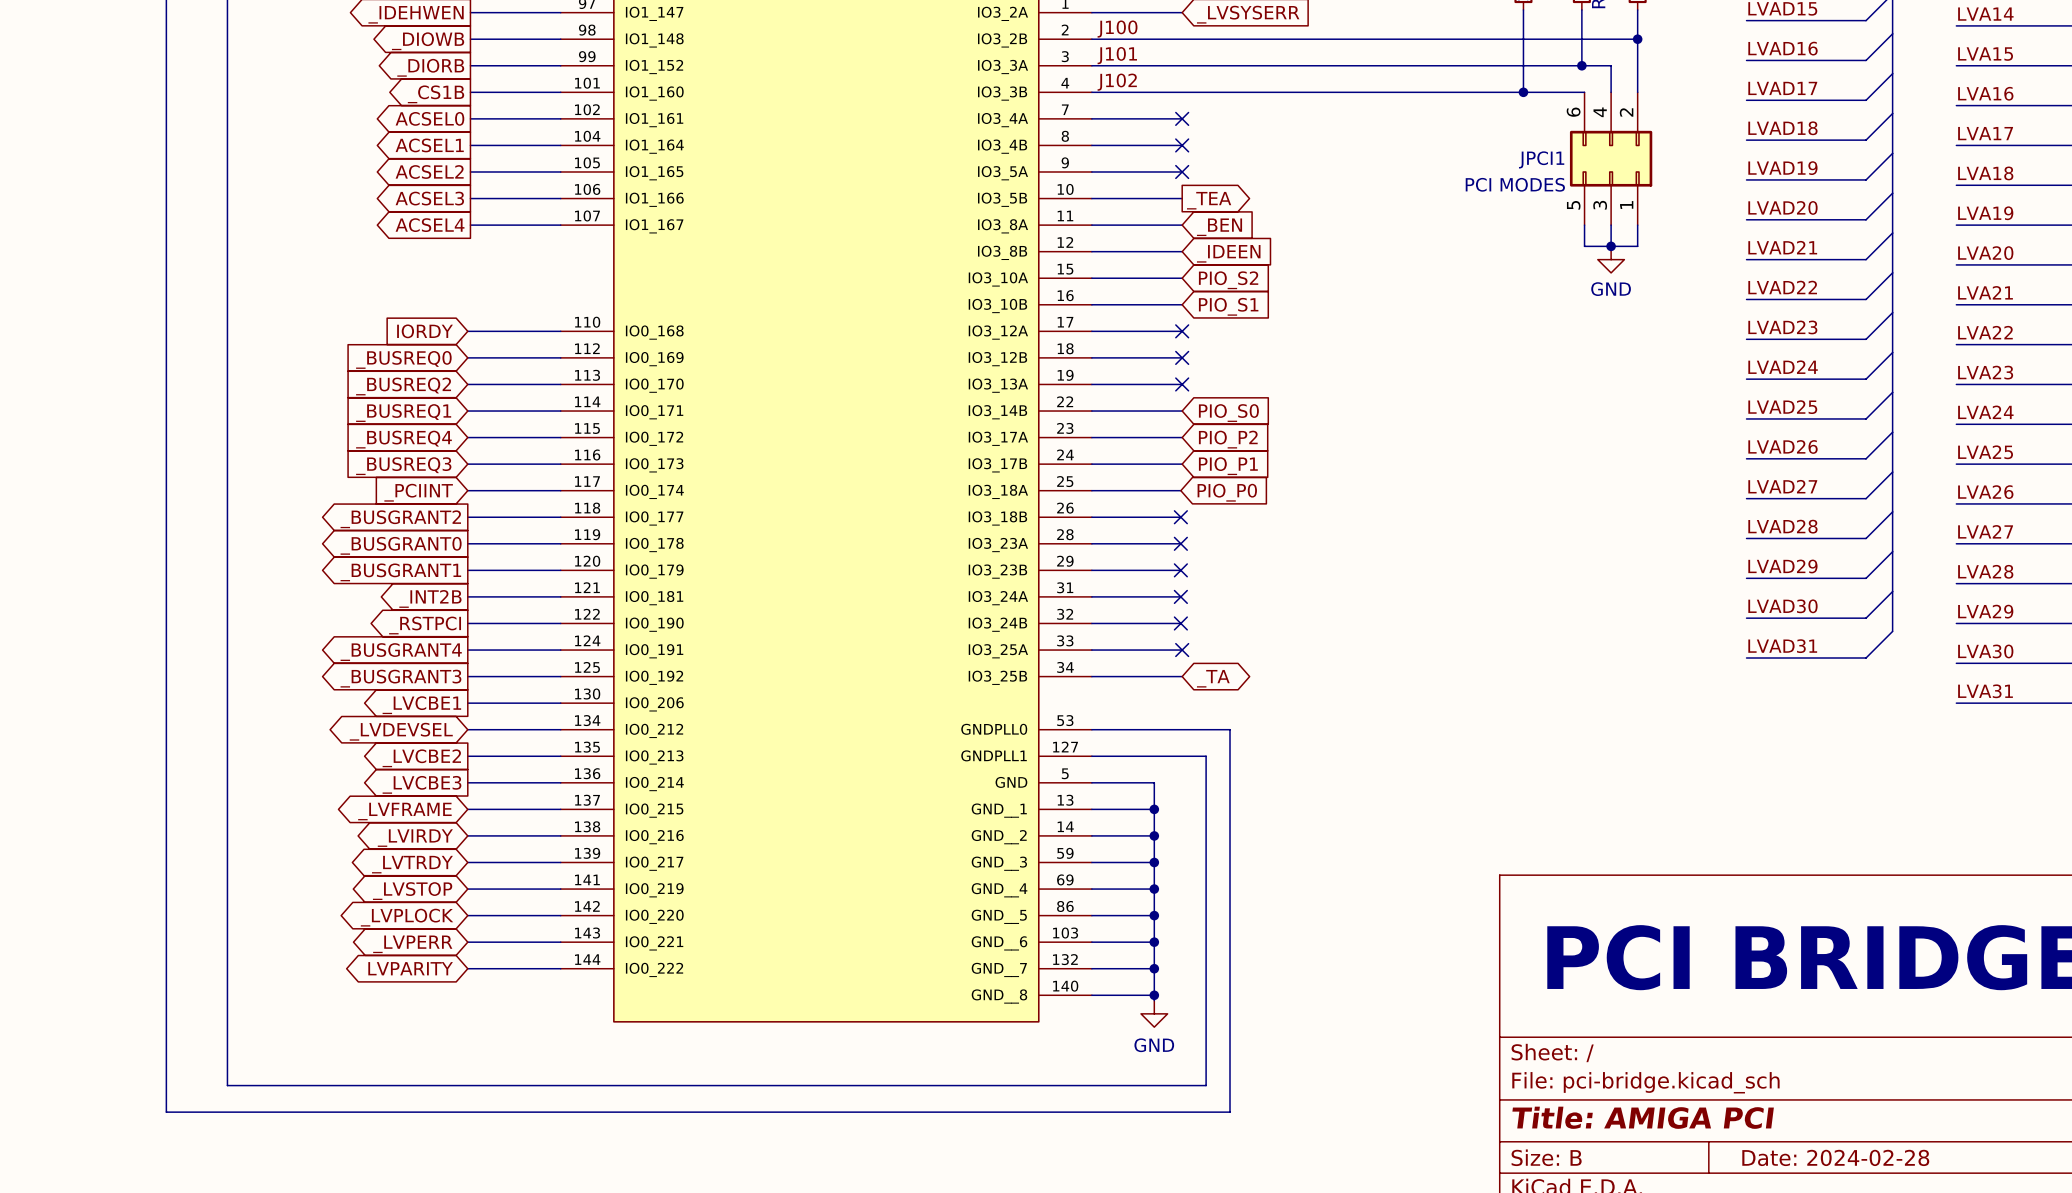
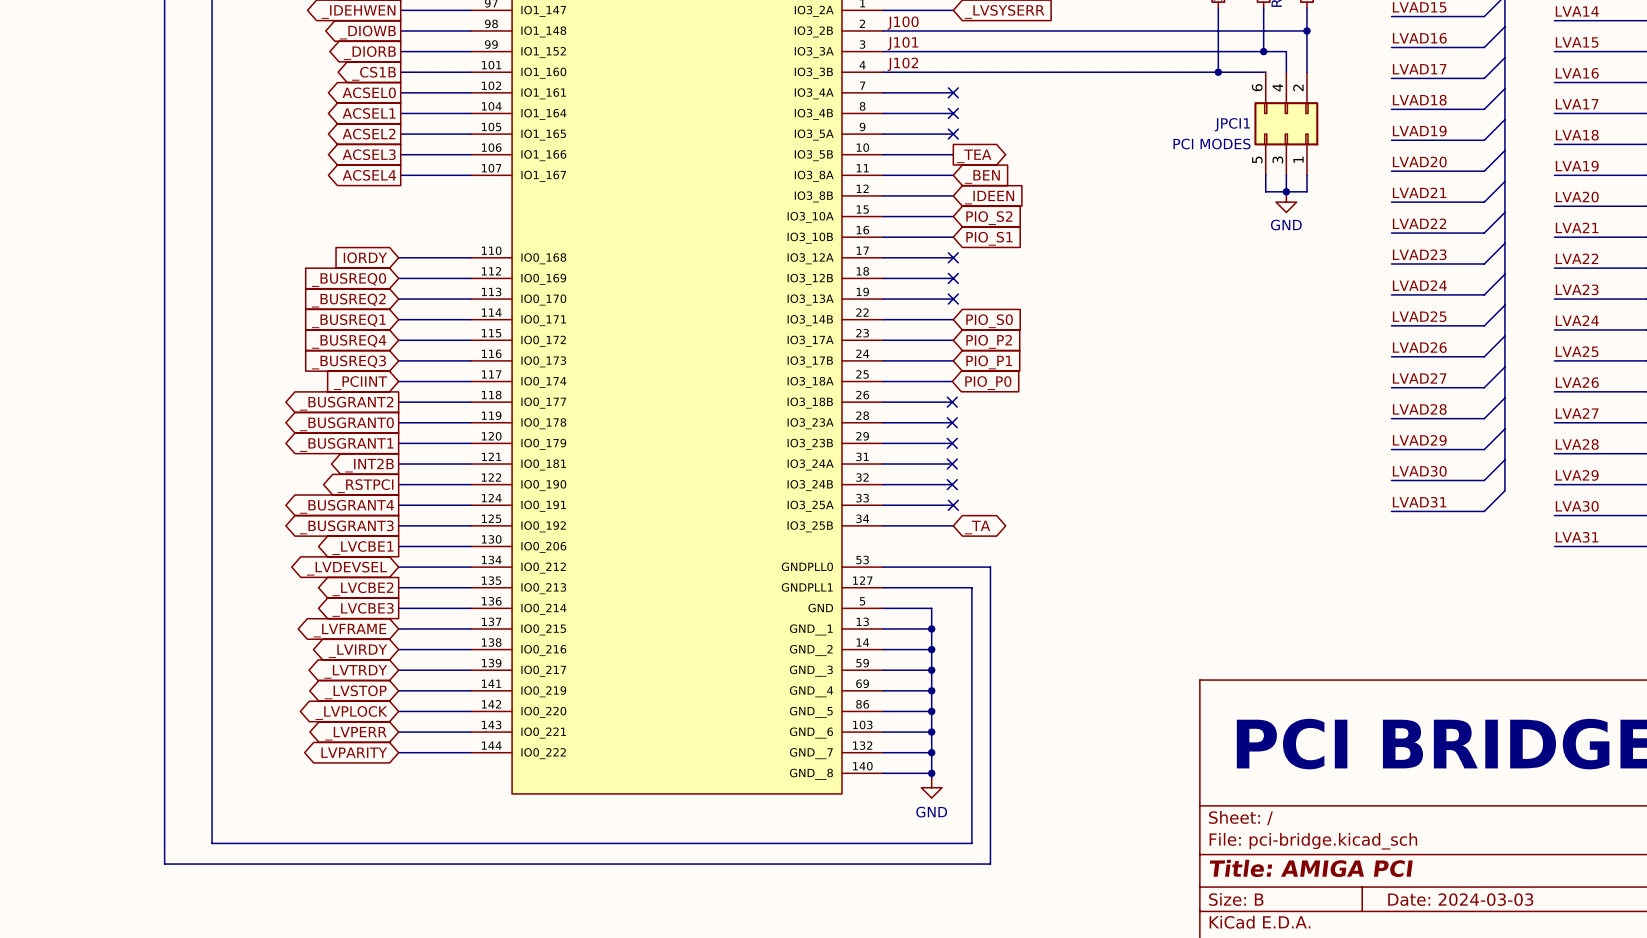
title block: Date: 2024-02-28 (1835, 1157) -> Date: 2024-03-03 (1460, 899)

